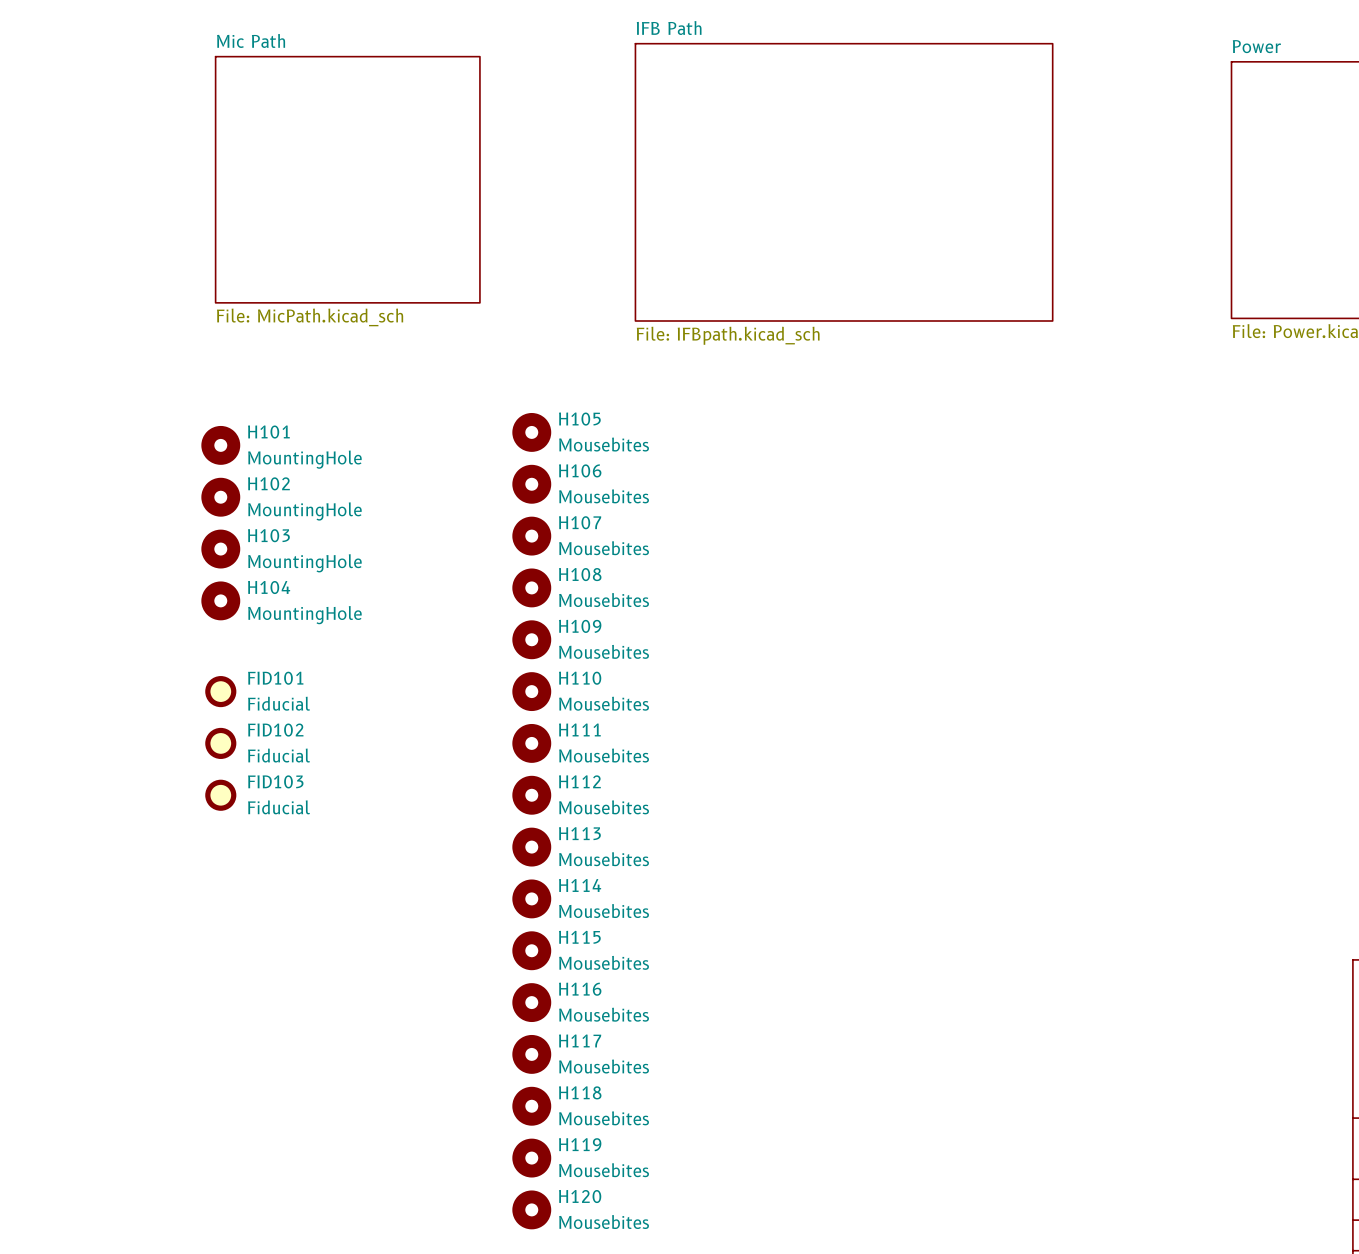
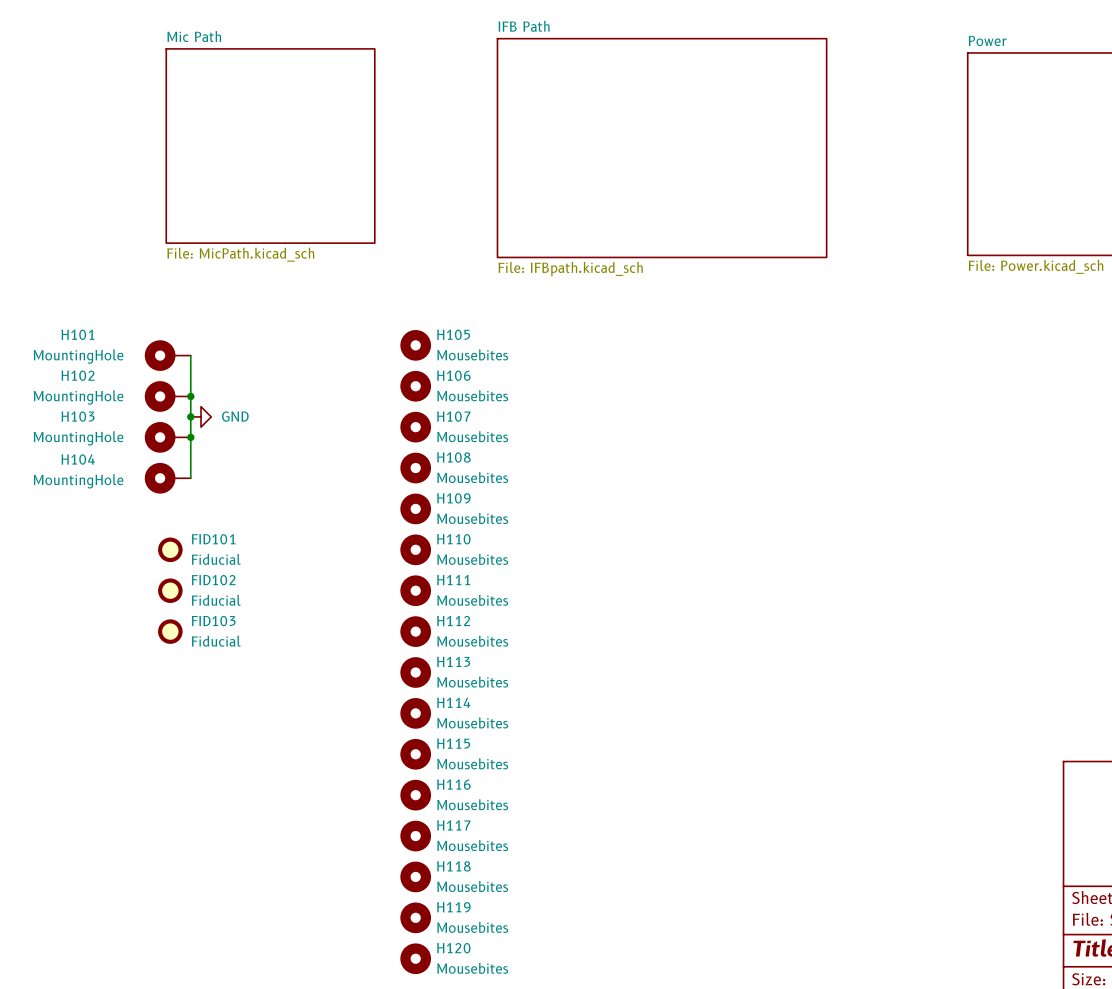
H101 symbol: [201, 425, 241, 465] -> [144, 340, 191, 371]
H101 name position: H101 (268, 432) -> H101 (78, 334)
wire: none -> (190, 355) (190, 478)
H101 value position: MountingHole (304, 459) -> MountingHole (78, 356)
H102 symbol: [201, 477, 241, 517] -> [144, 381, 191, 412]
H102 name position: H102 (268, 483) -> H102 (78, 375)
junction: none -> (190, 396)
H102 value position: MountingHole (304, 511) -> MountingHole (78, 397)
junction: none -> (190, 416)
power symbol: none -> GND (201, 416)
H103 symbol: [201, 529, 241, 569] -> [144, 422, 191, 453]
H103 name position: H103 (268, 535) -> H103 (78, 416)
junction: none -> (190, 437)
H103 value position: MountingHole (304, 563) -> MountingHole (78, 438)
H104 symbol: [201, 581, 241, 621] -> [144, 462, 191, 494]
H104 name position: H104 (269, 587) -> H104 (78, 459)
H104 value position: MountingHole (304, 615) -> MountingHole (78, 481)

